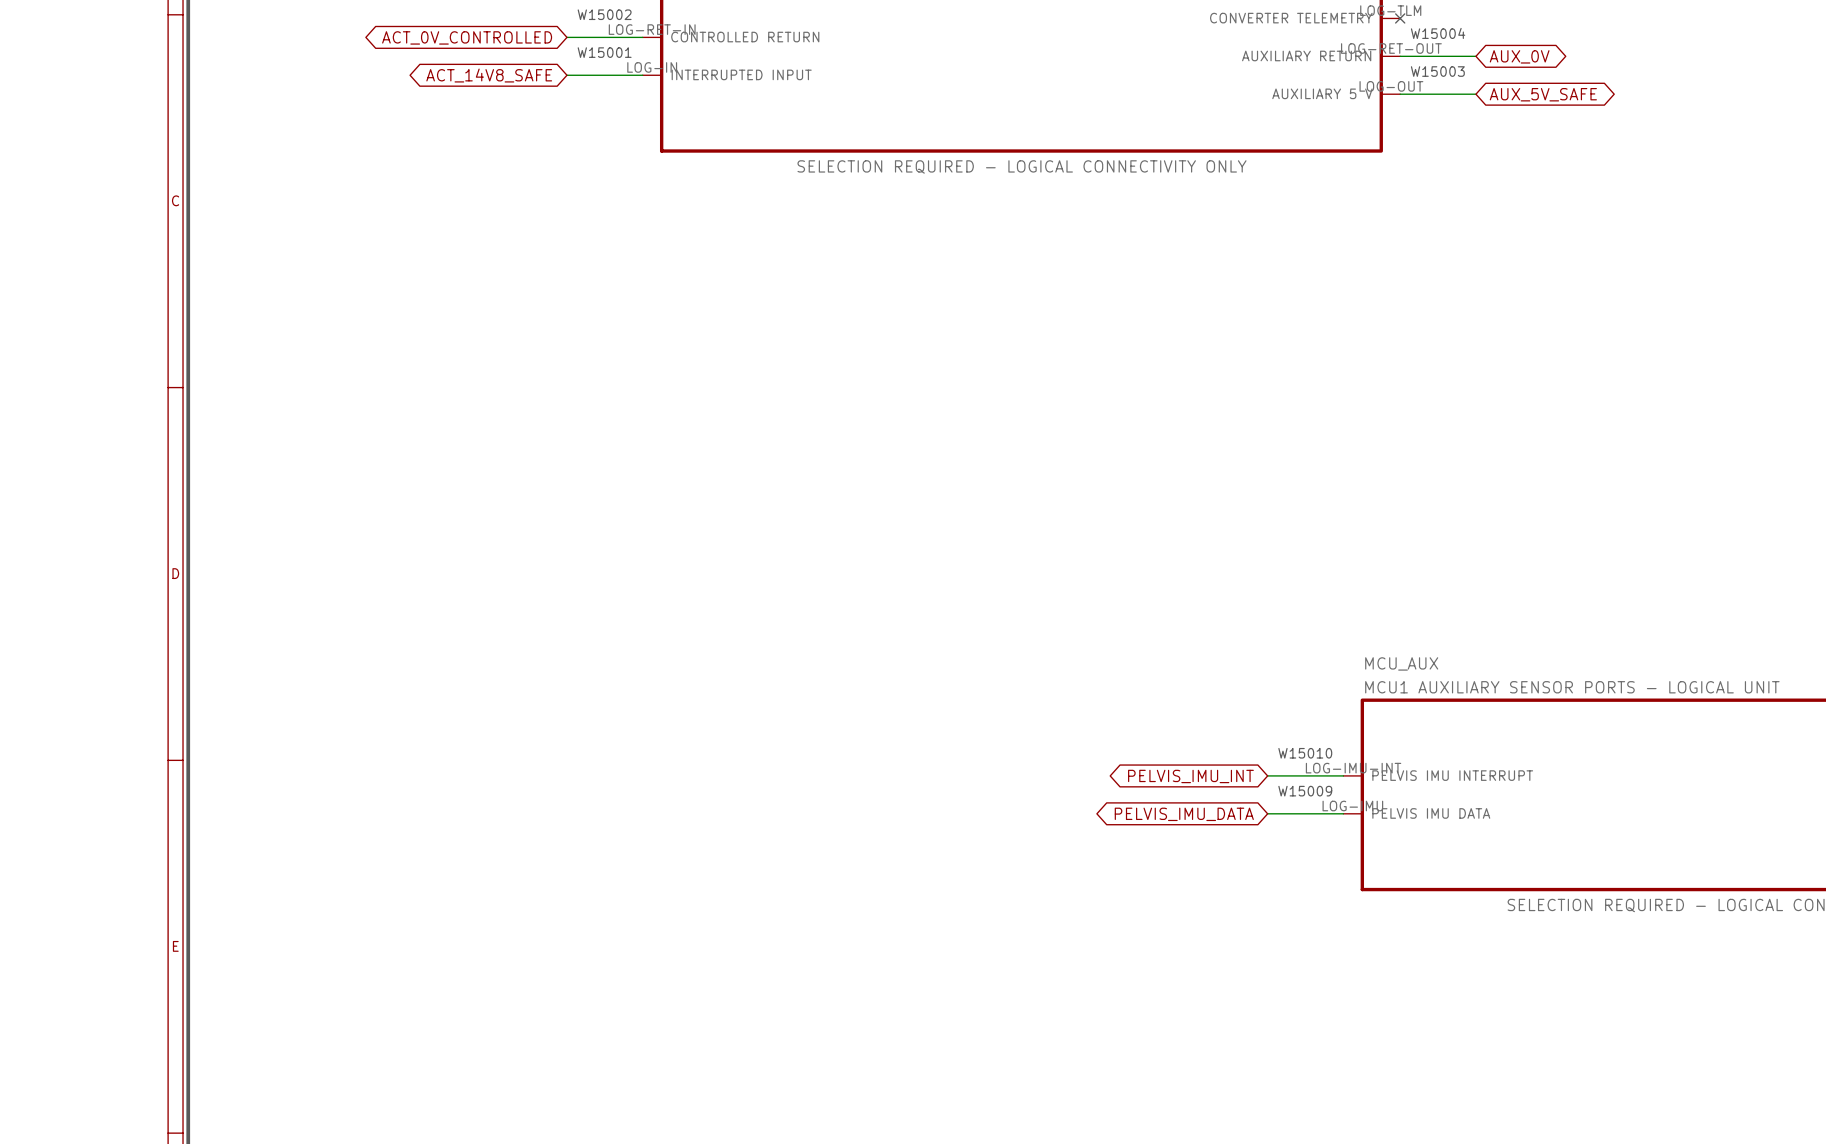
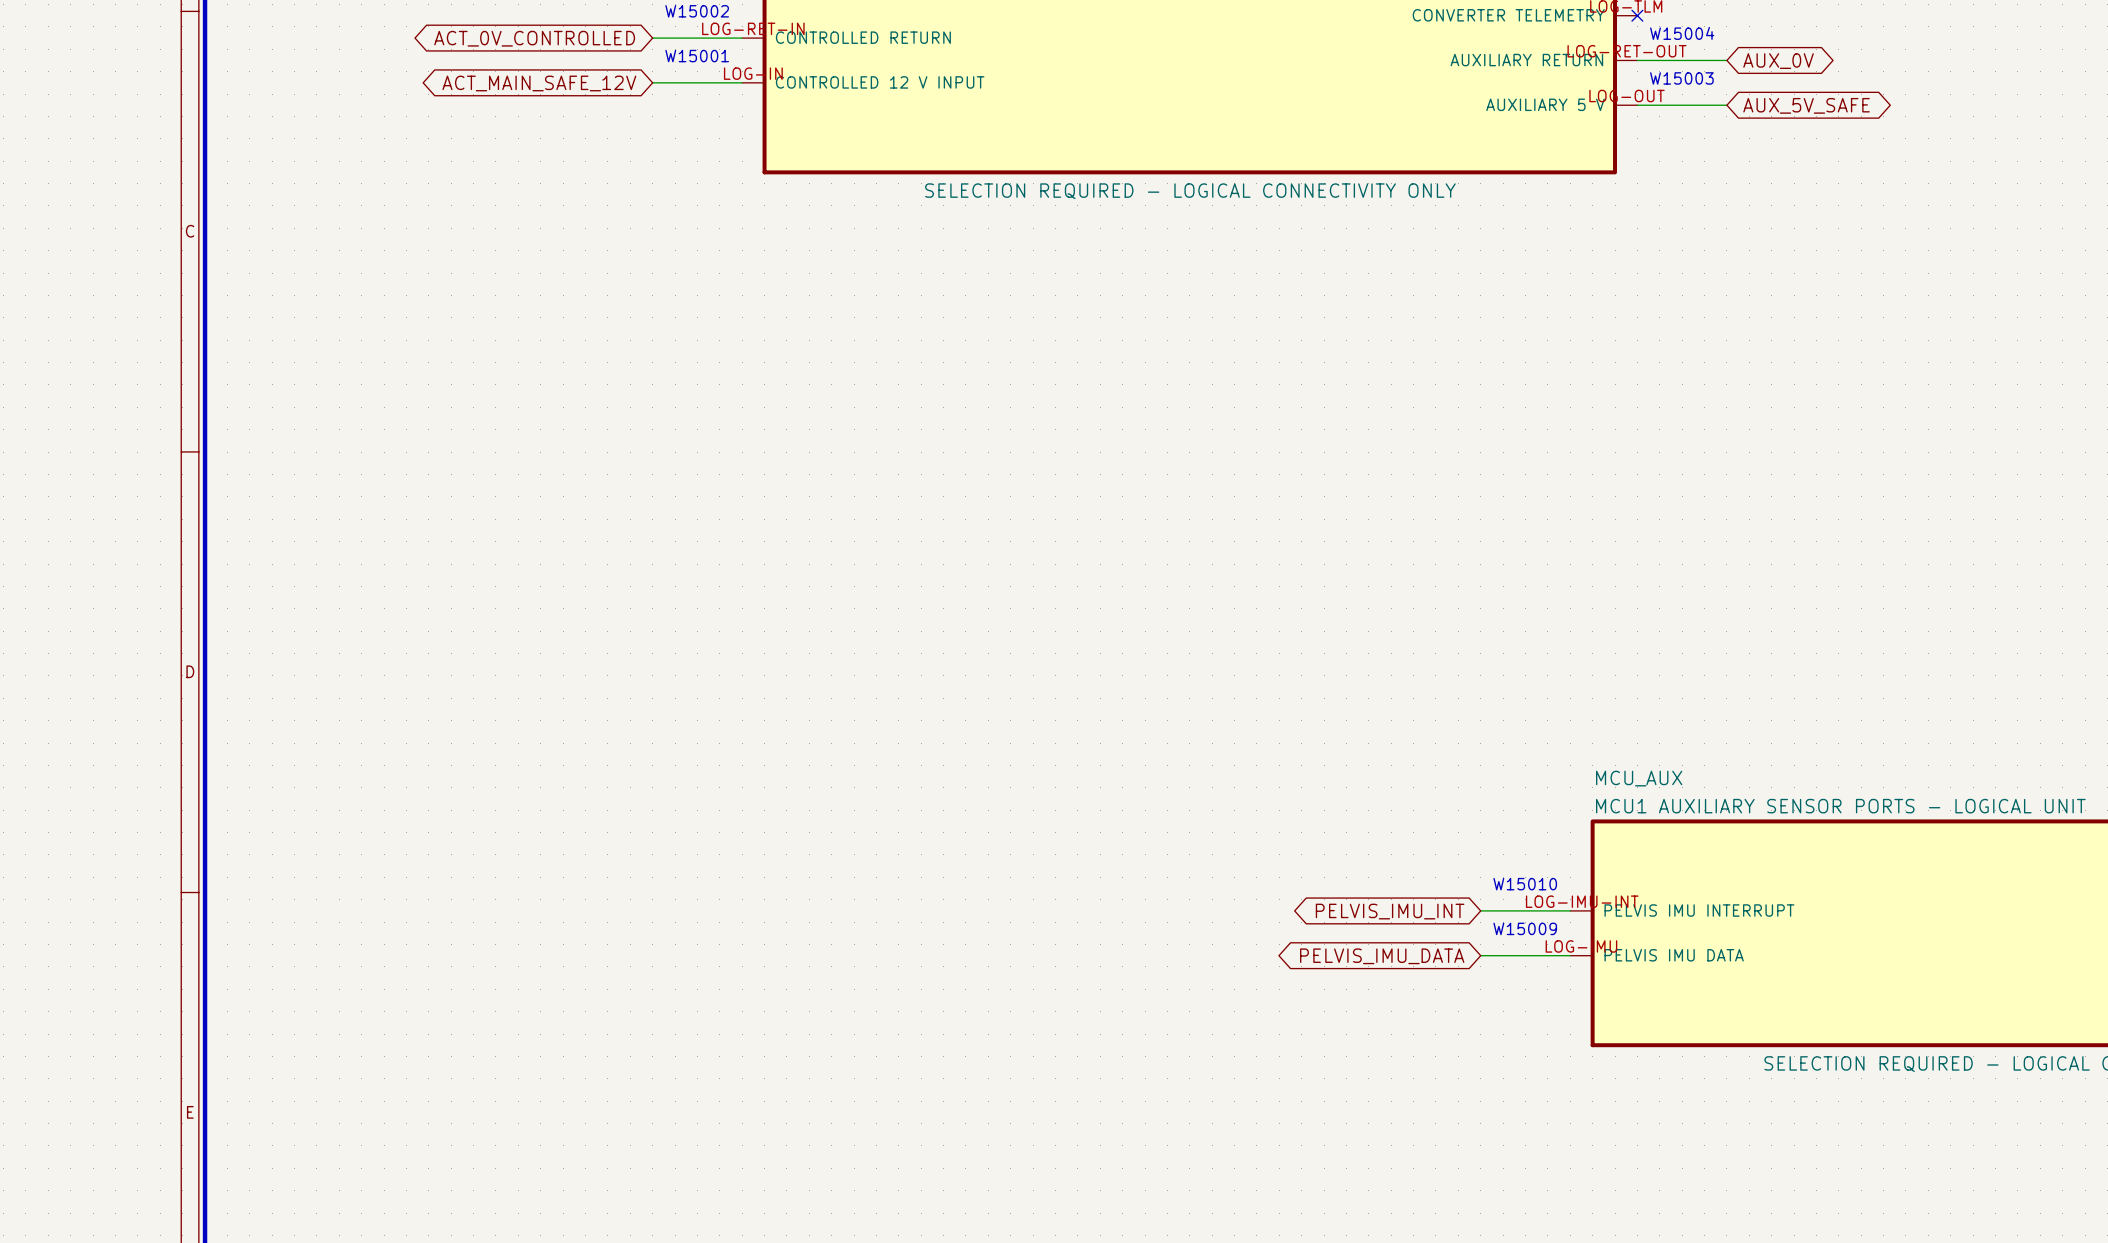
part pin name: INTERRUPTED INPUT (741, 74) -> CONTROLLED 12 V INPUT (880, 82)
global label: ACT_14V8_SAFE (489, 75) -> ACT_MAIN_SAFE_12V (539, 83)

